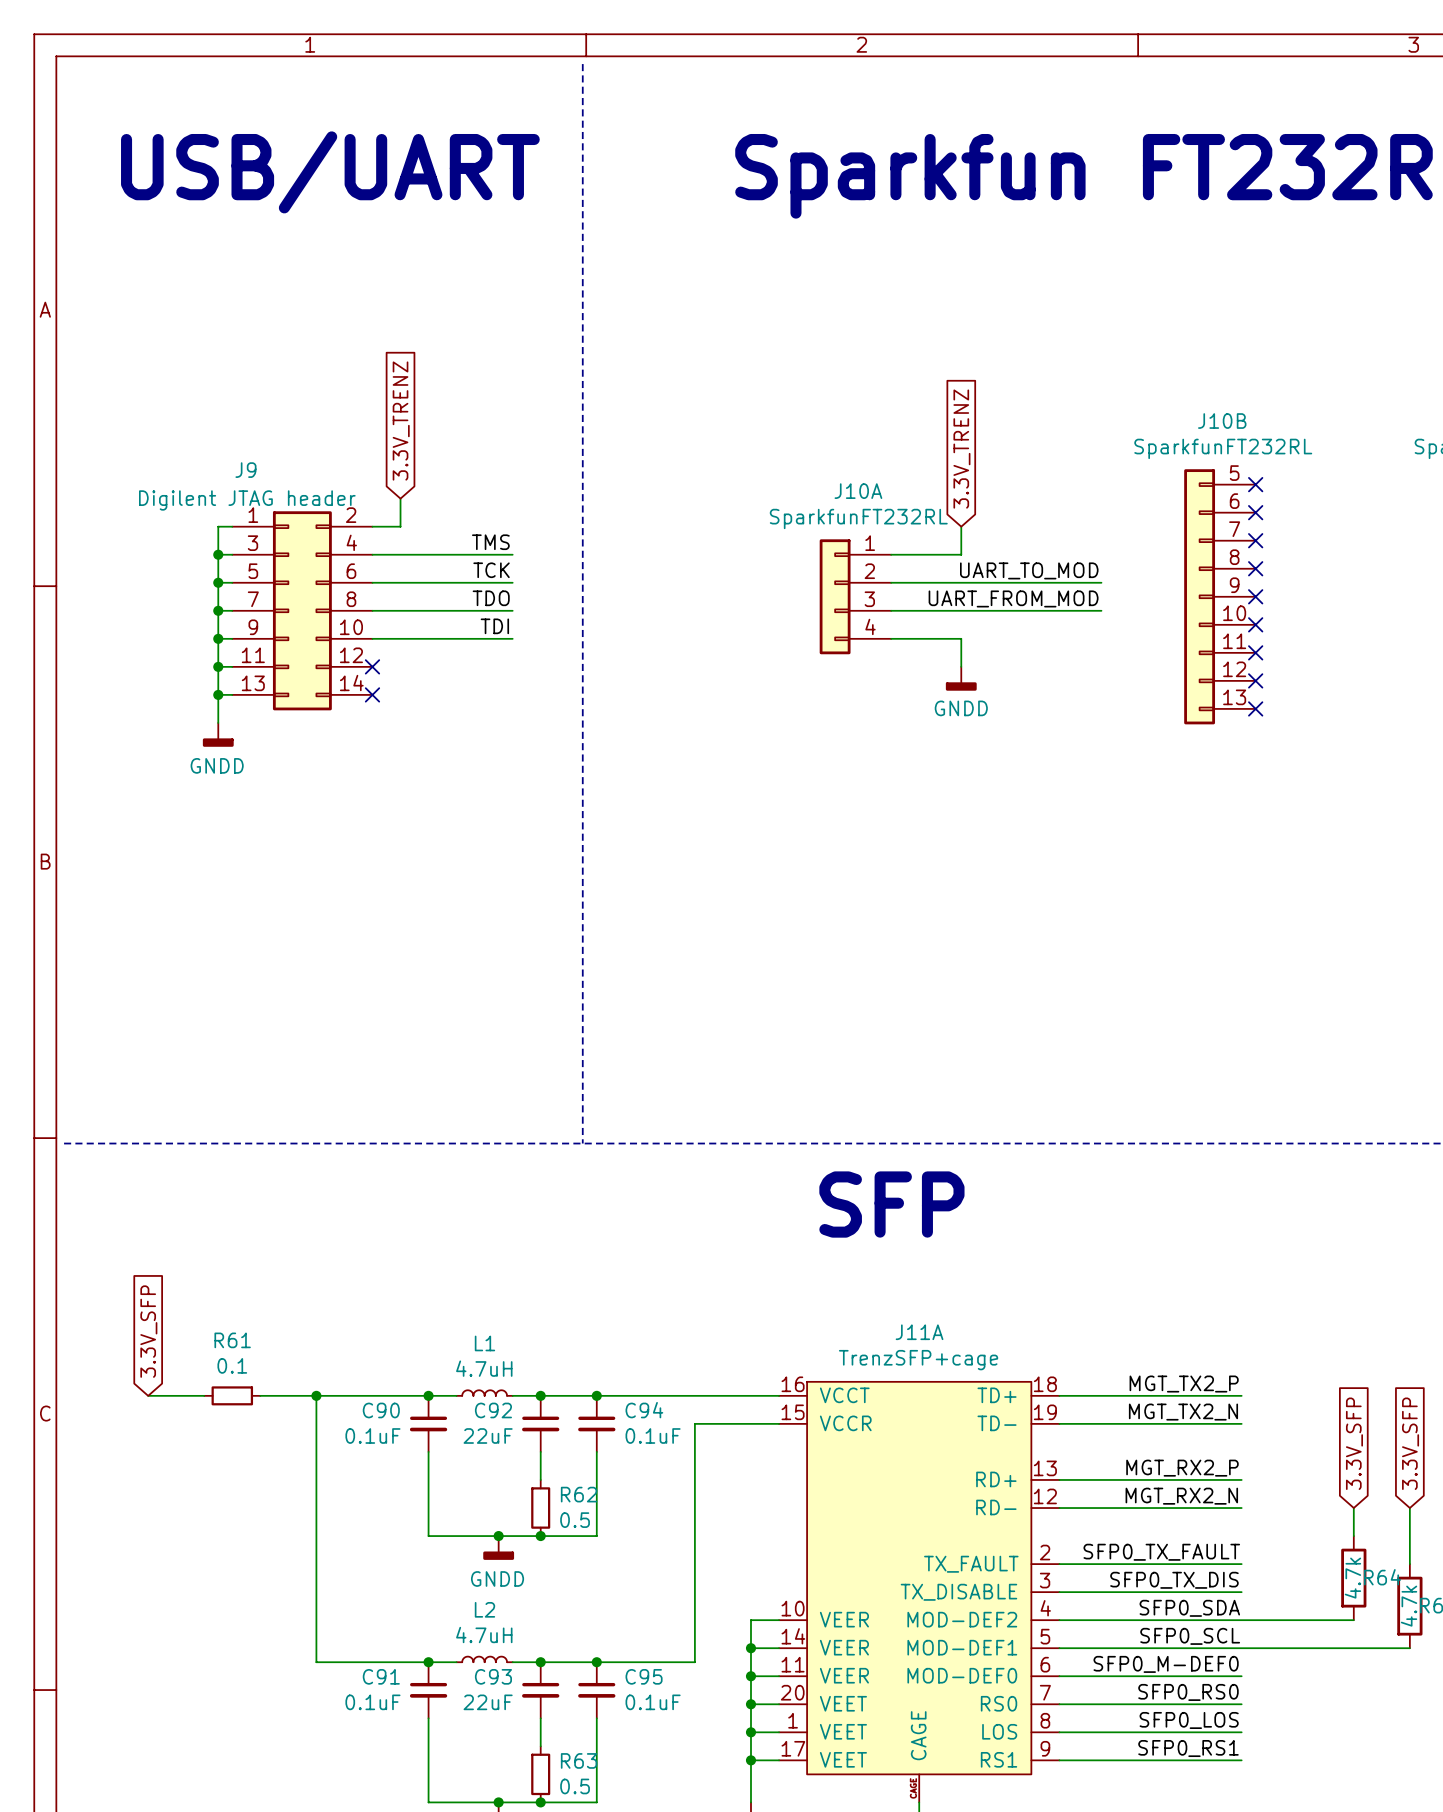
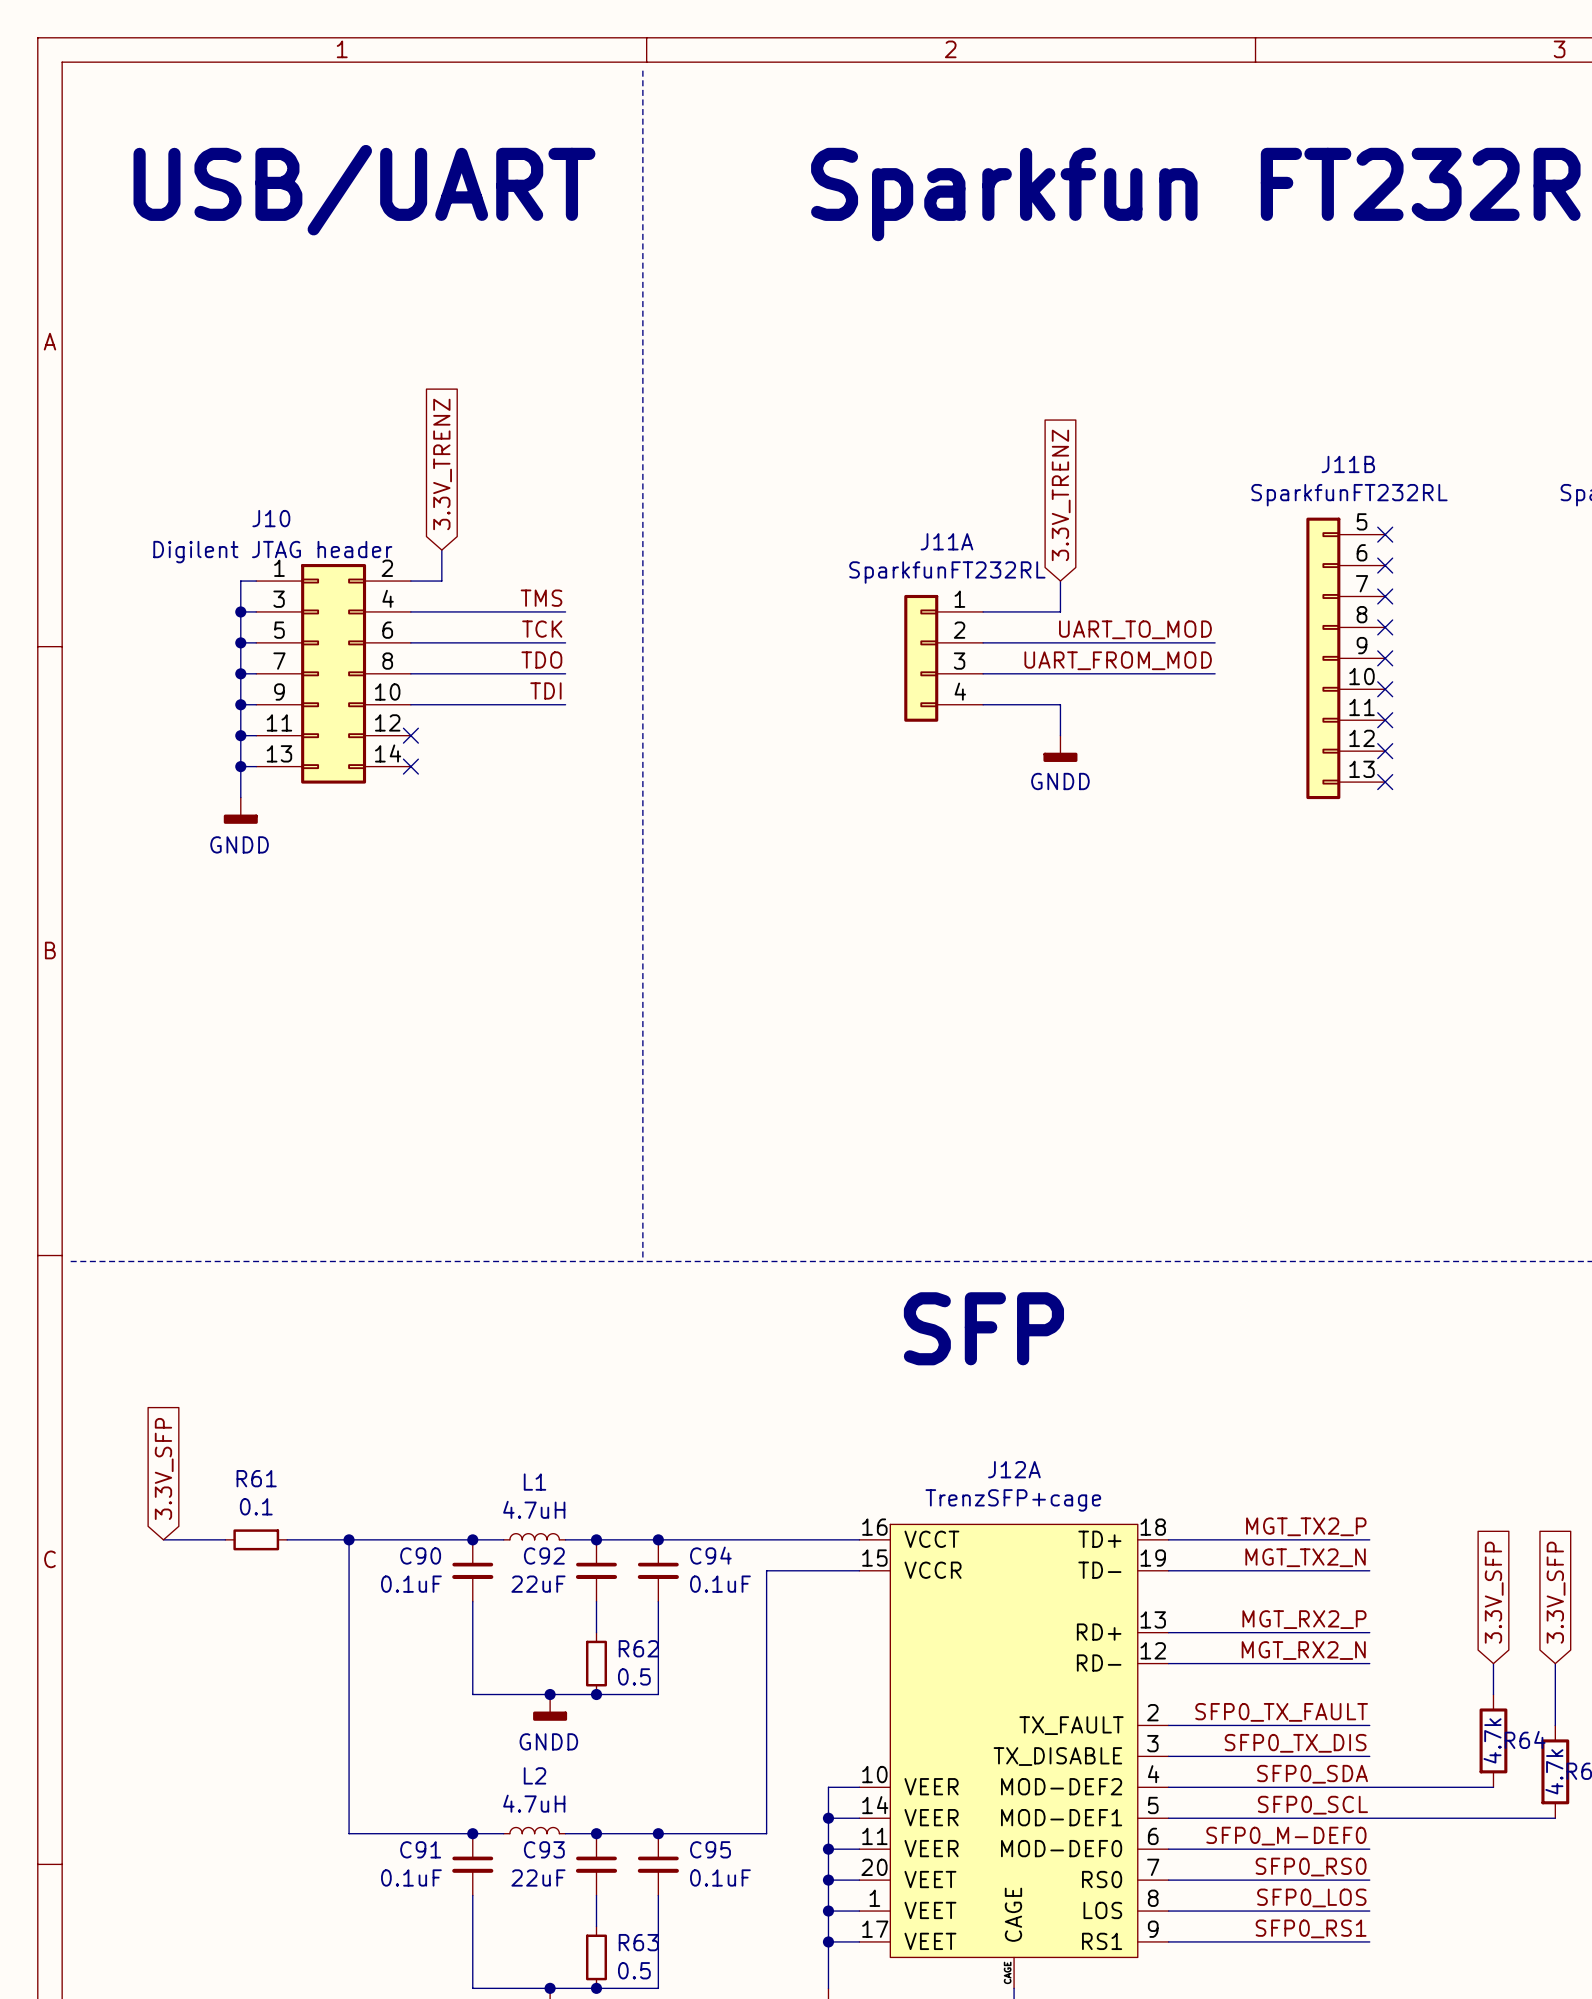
J10B name: J10B (1222, 421) -> J11B (1348, 464)
J9 name: J9 (245, 470) -> J10 (271, 518)
J10A name: J10A (858, 491) -> J11A (946, 541)
J11A name: J11A (919, 1332) -> J12A (1014, 1469)

